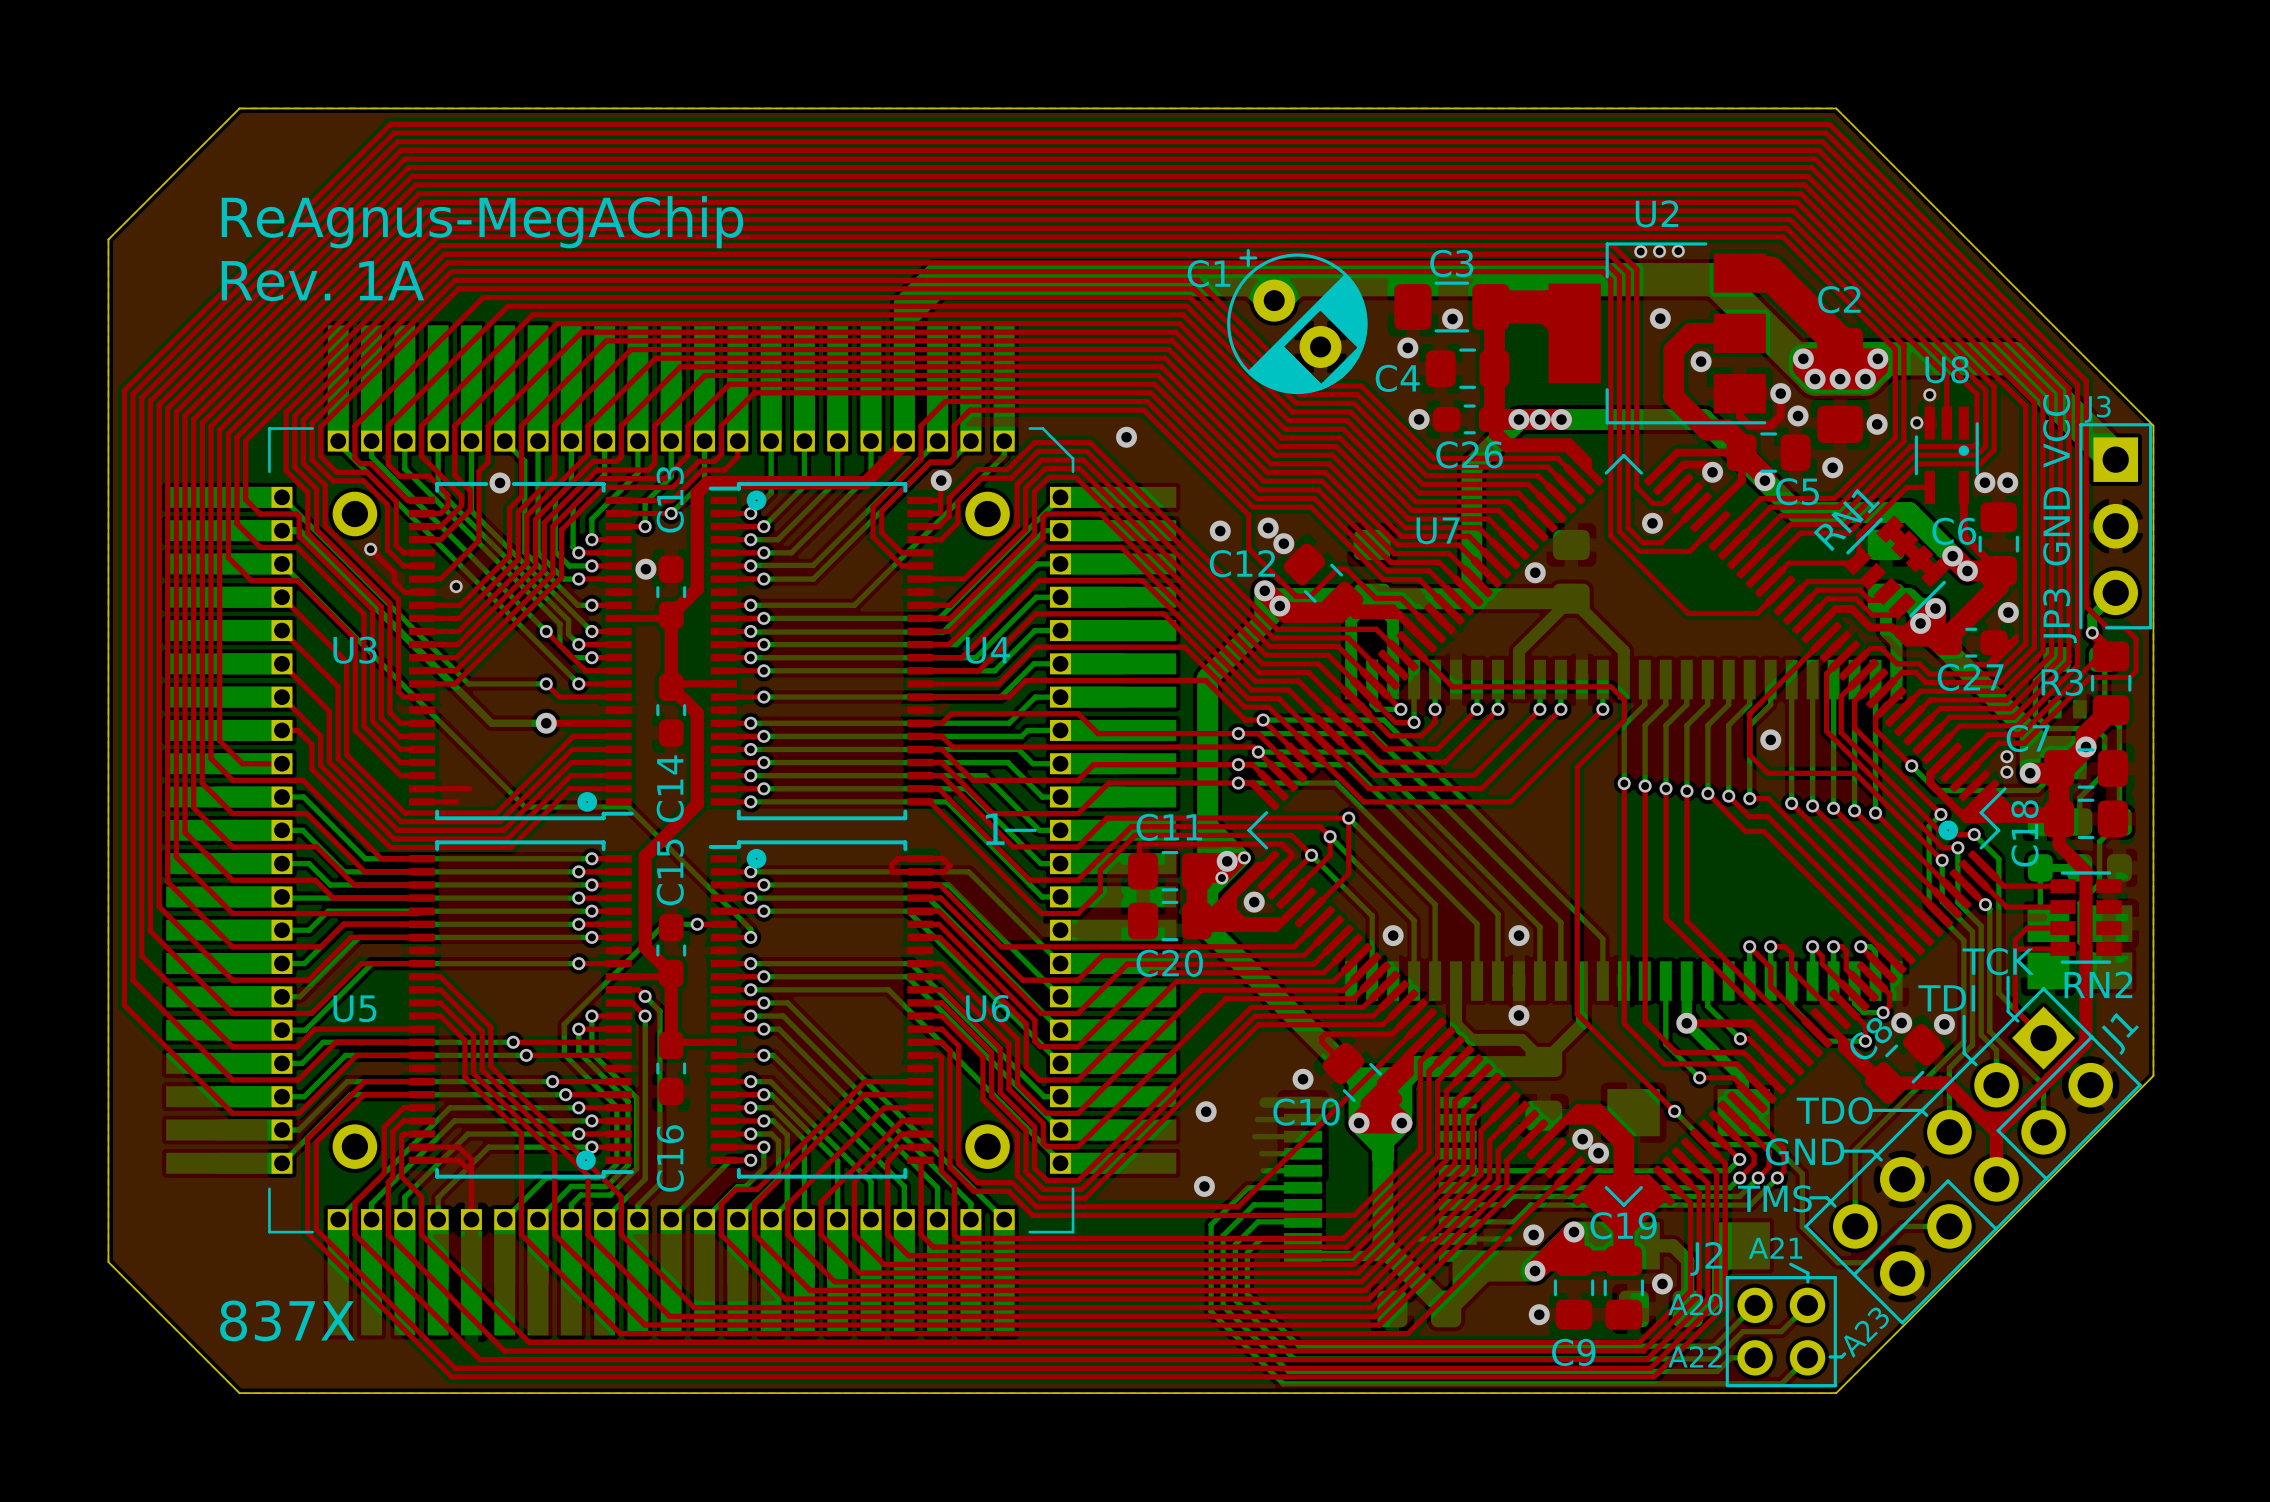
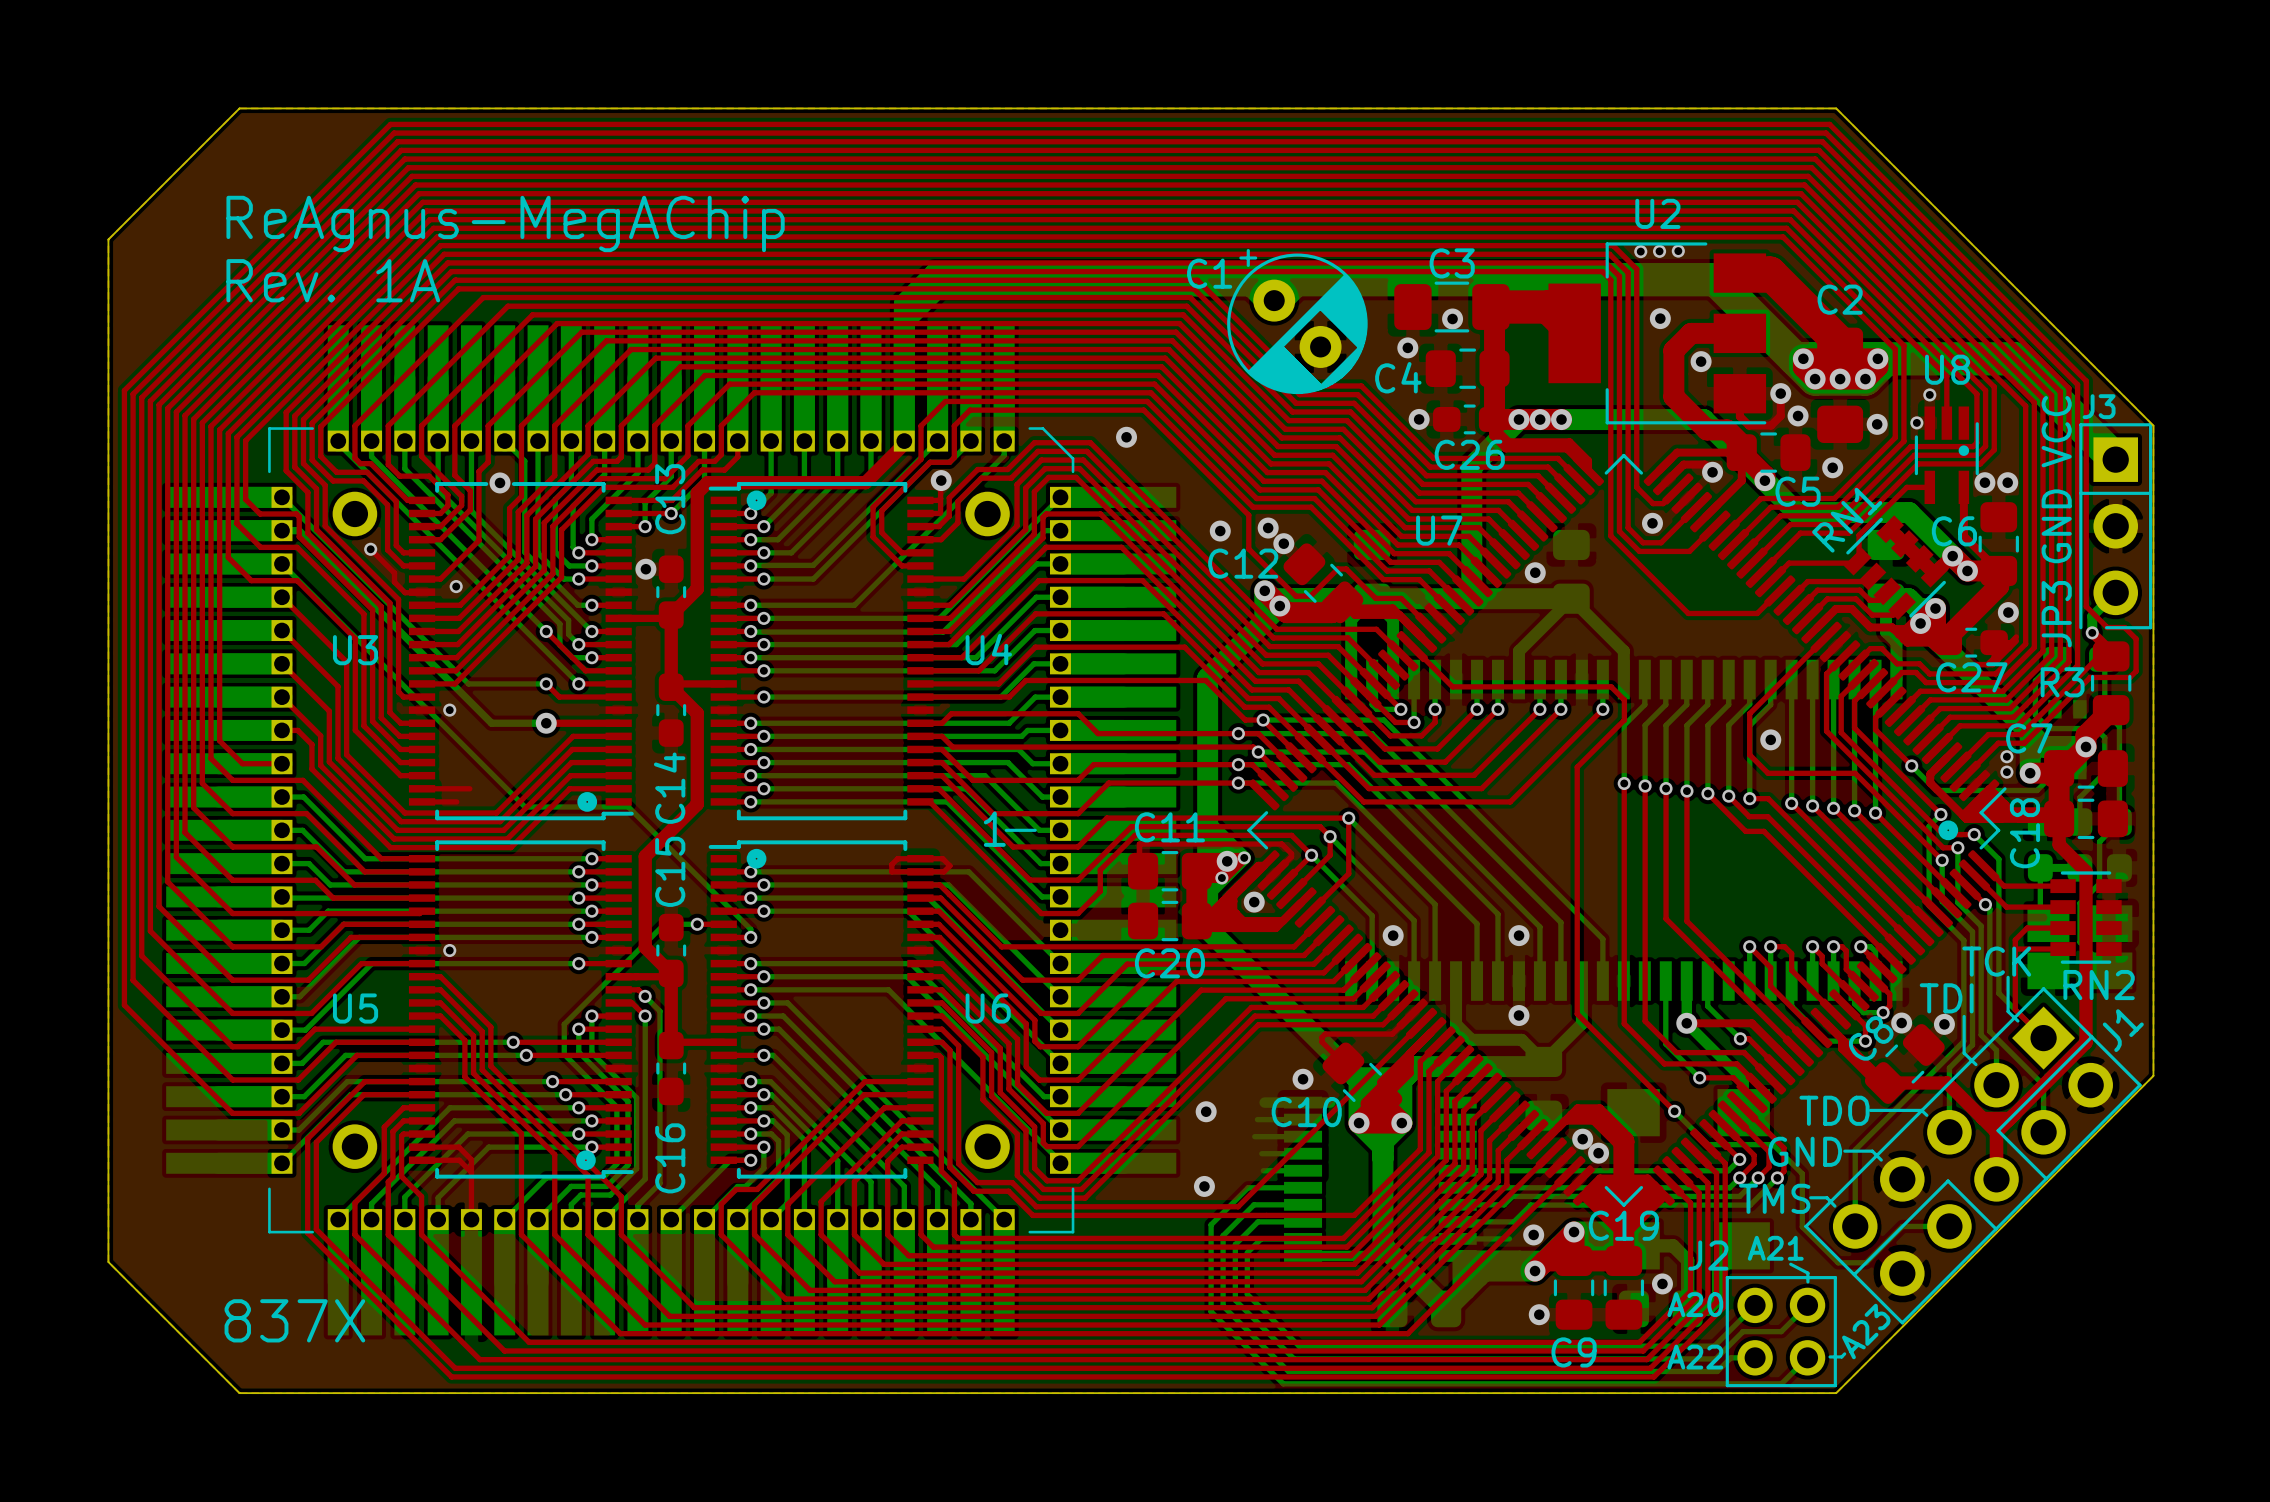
line: none -> (2080, 493) (2150, 493)
via: none -> (449, 710)
C7 footprint: [2044, 748, 2128, 789] -> [2044, 750, 2128, 789]
via: none -> (449, 950)

